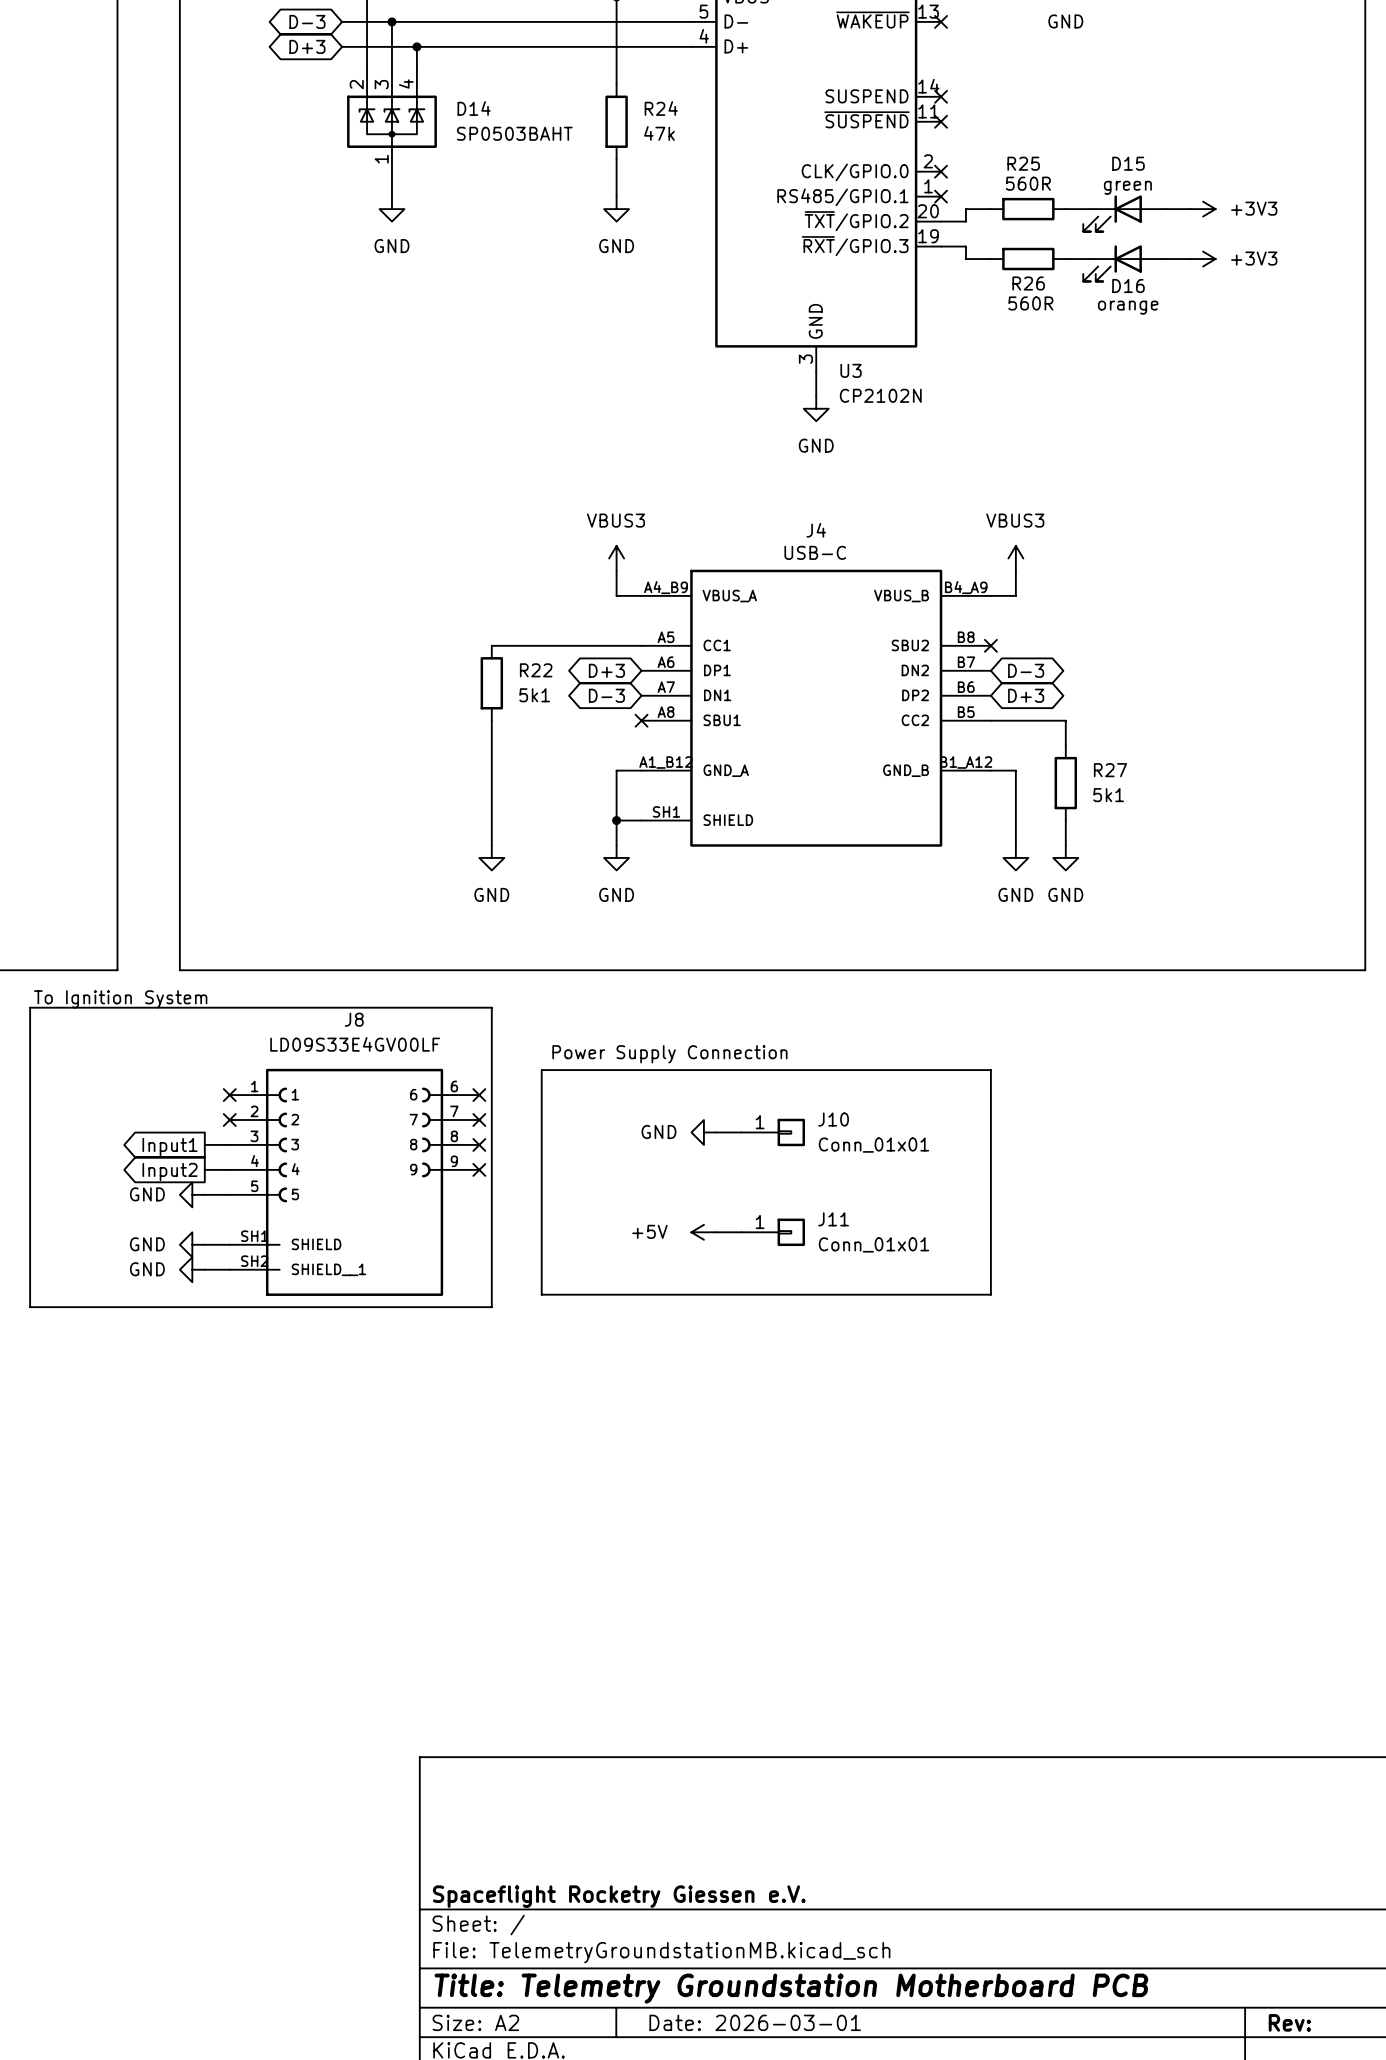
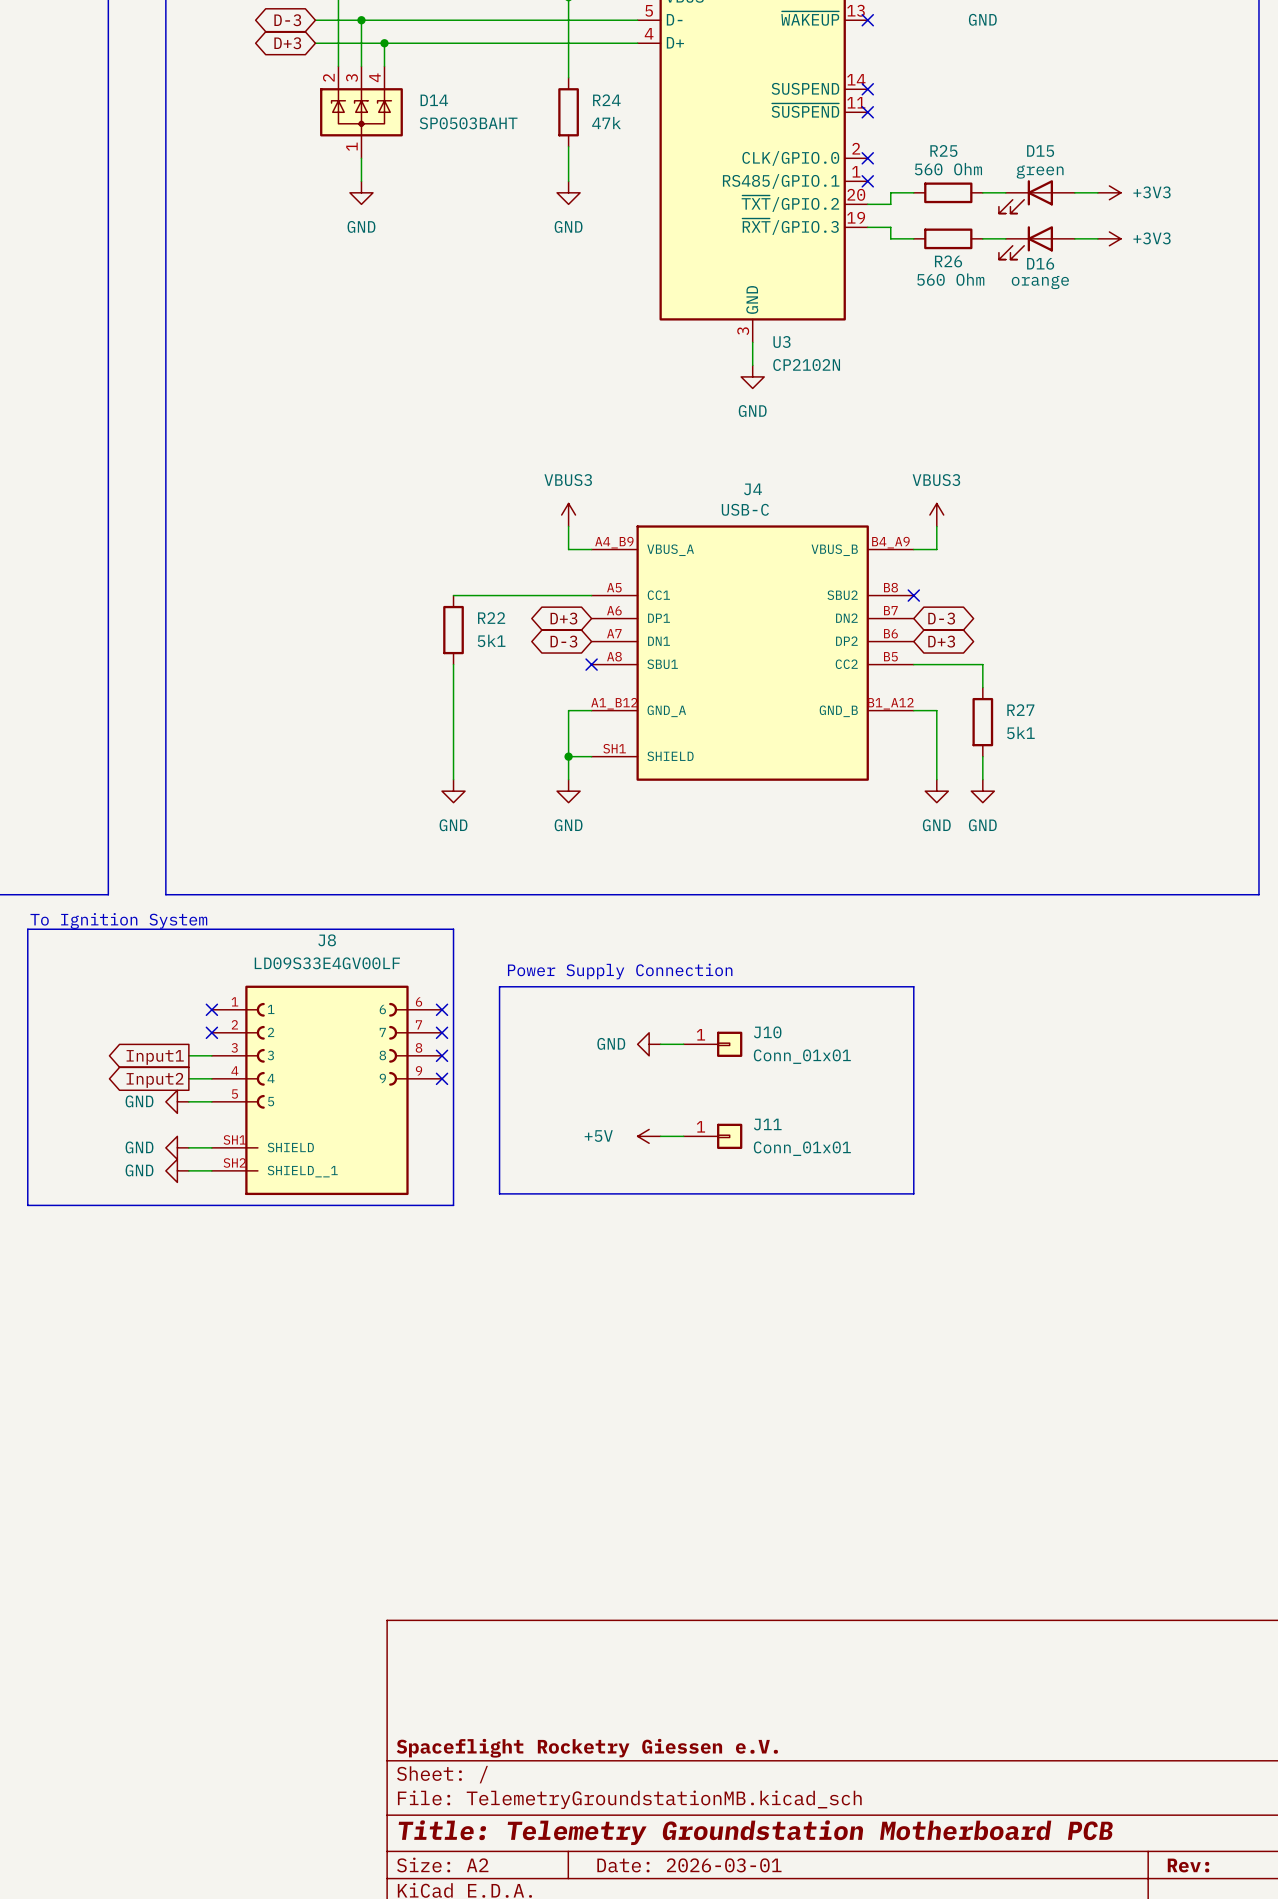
R25 value: 560R (1028, 183) -> 560 Ohm (948, 169)
R26 value: 560R (1030, 303) -> 560 Ohm (950, 279)

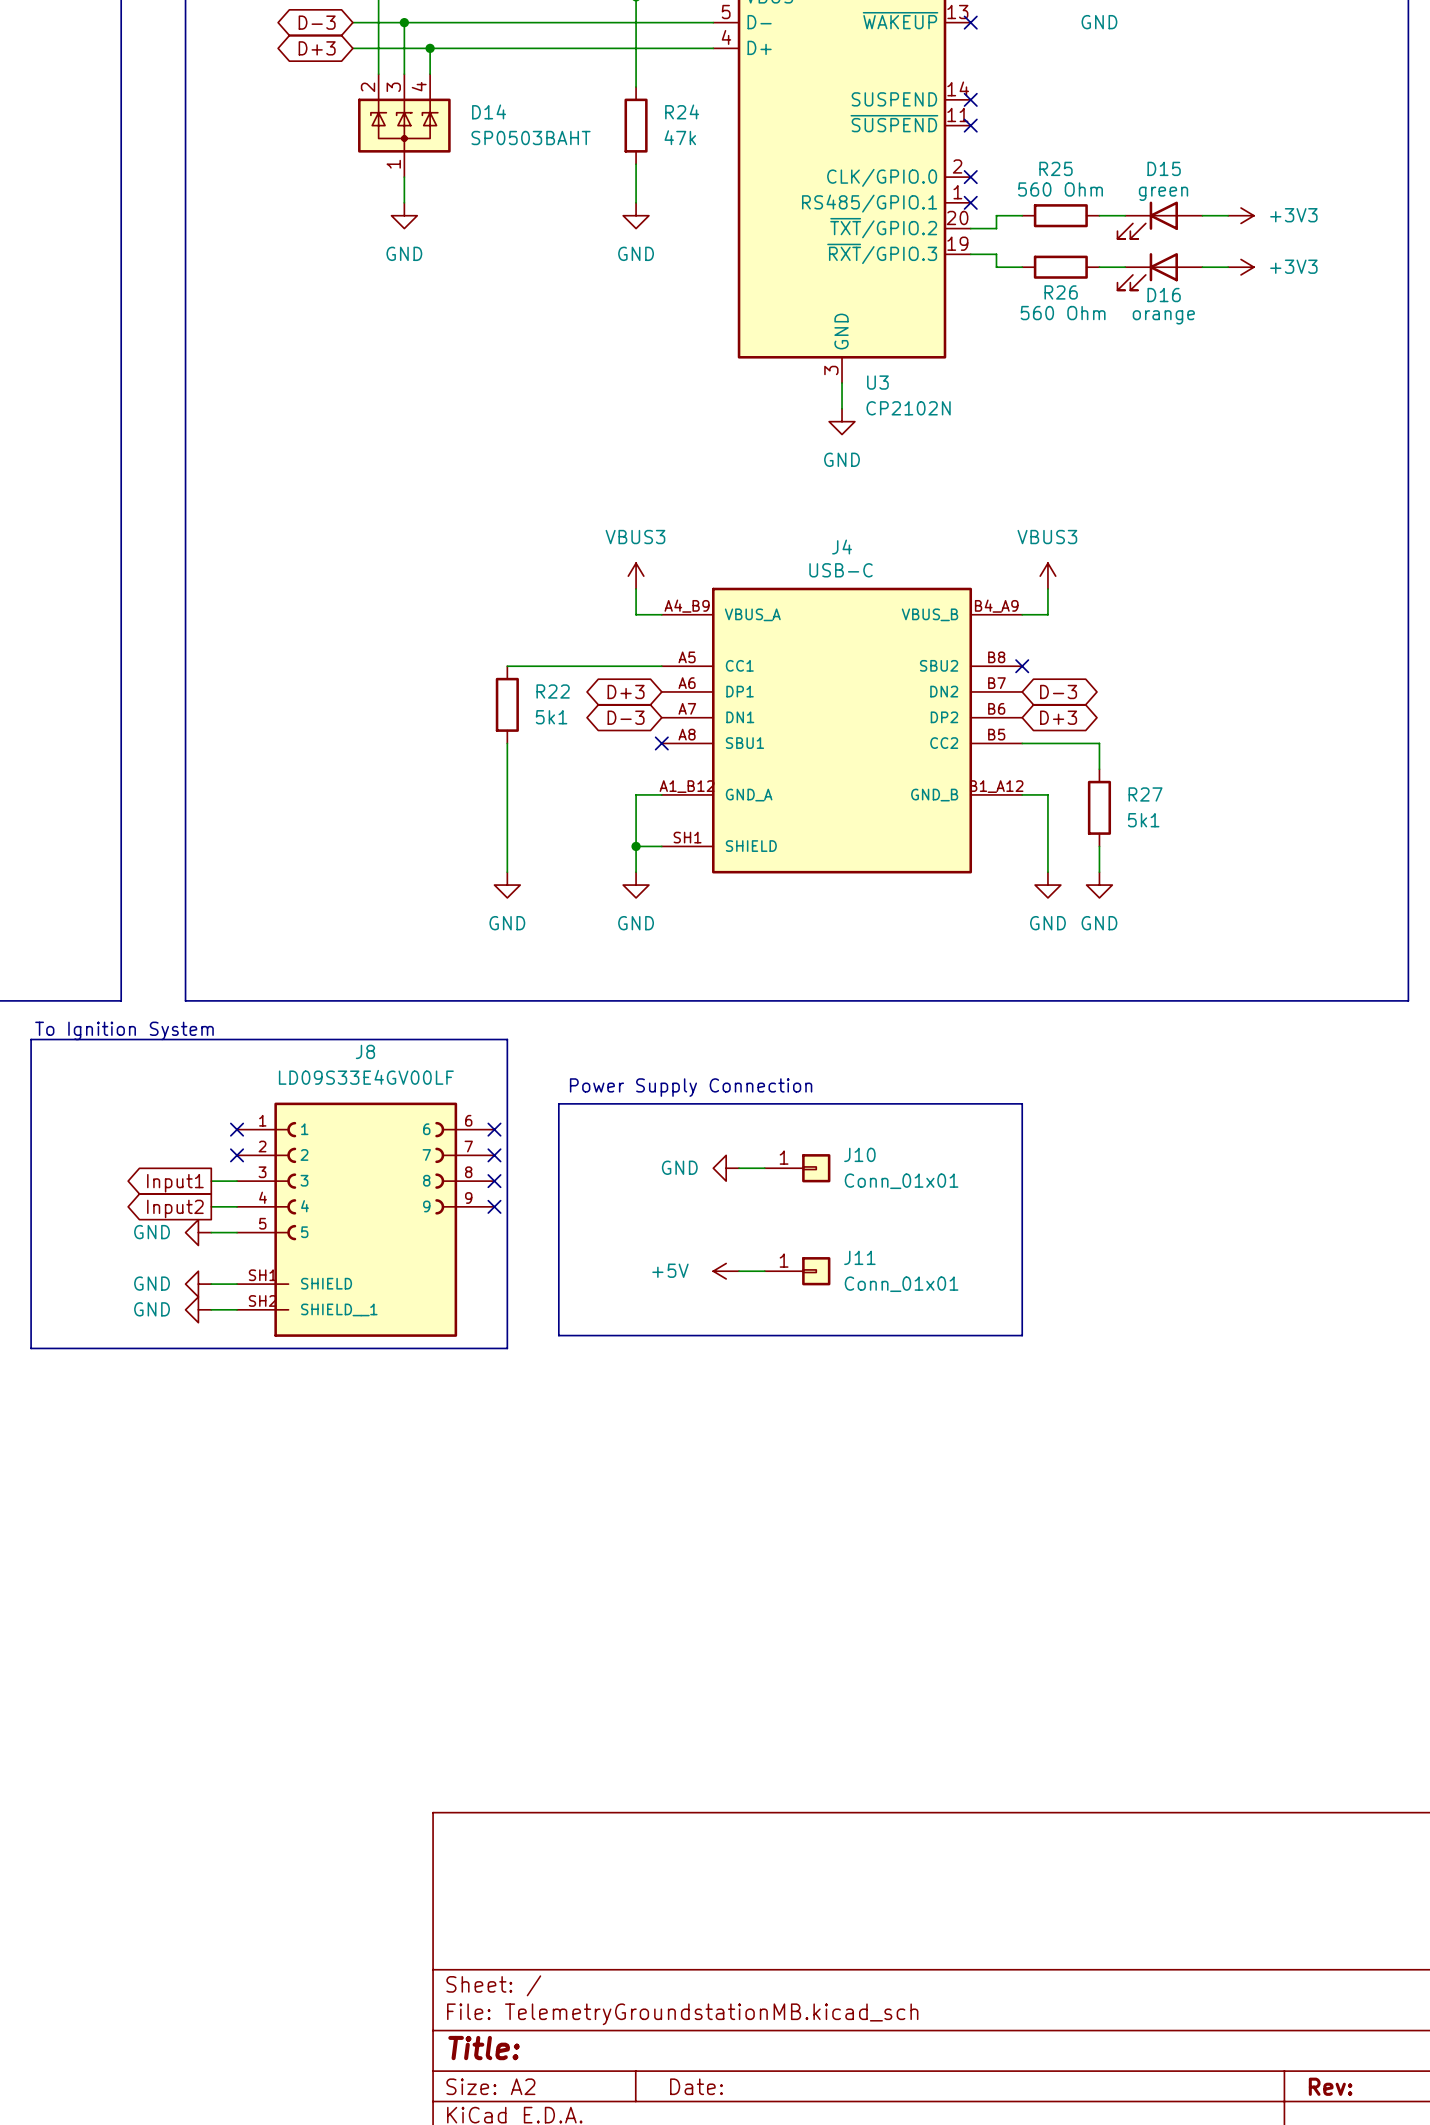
title block: Spaceflight Rocketry Giessen e.V. (587, 1748) -> none
title block: Title: Telemetry Groundstation Motherboard PCB (755, 1832) -> Title: (484, 2048)
title block: Date: 2026-03-01 (689, 1865) -> Date: (696, 2086)

